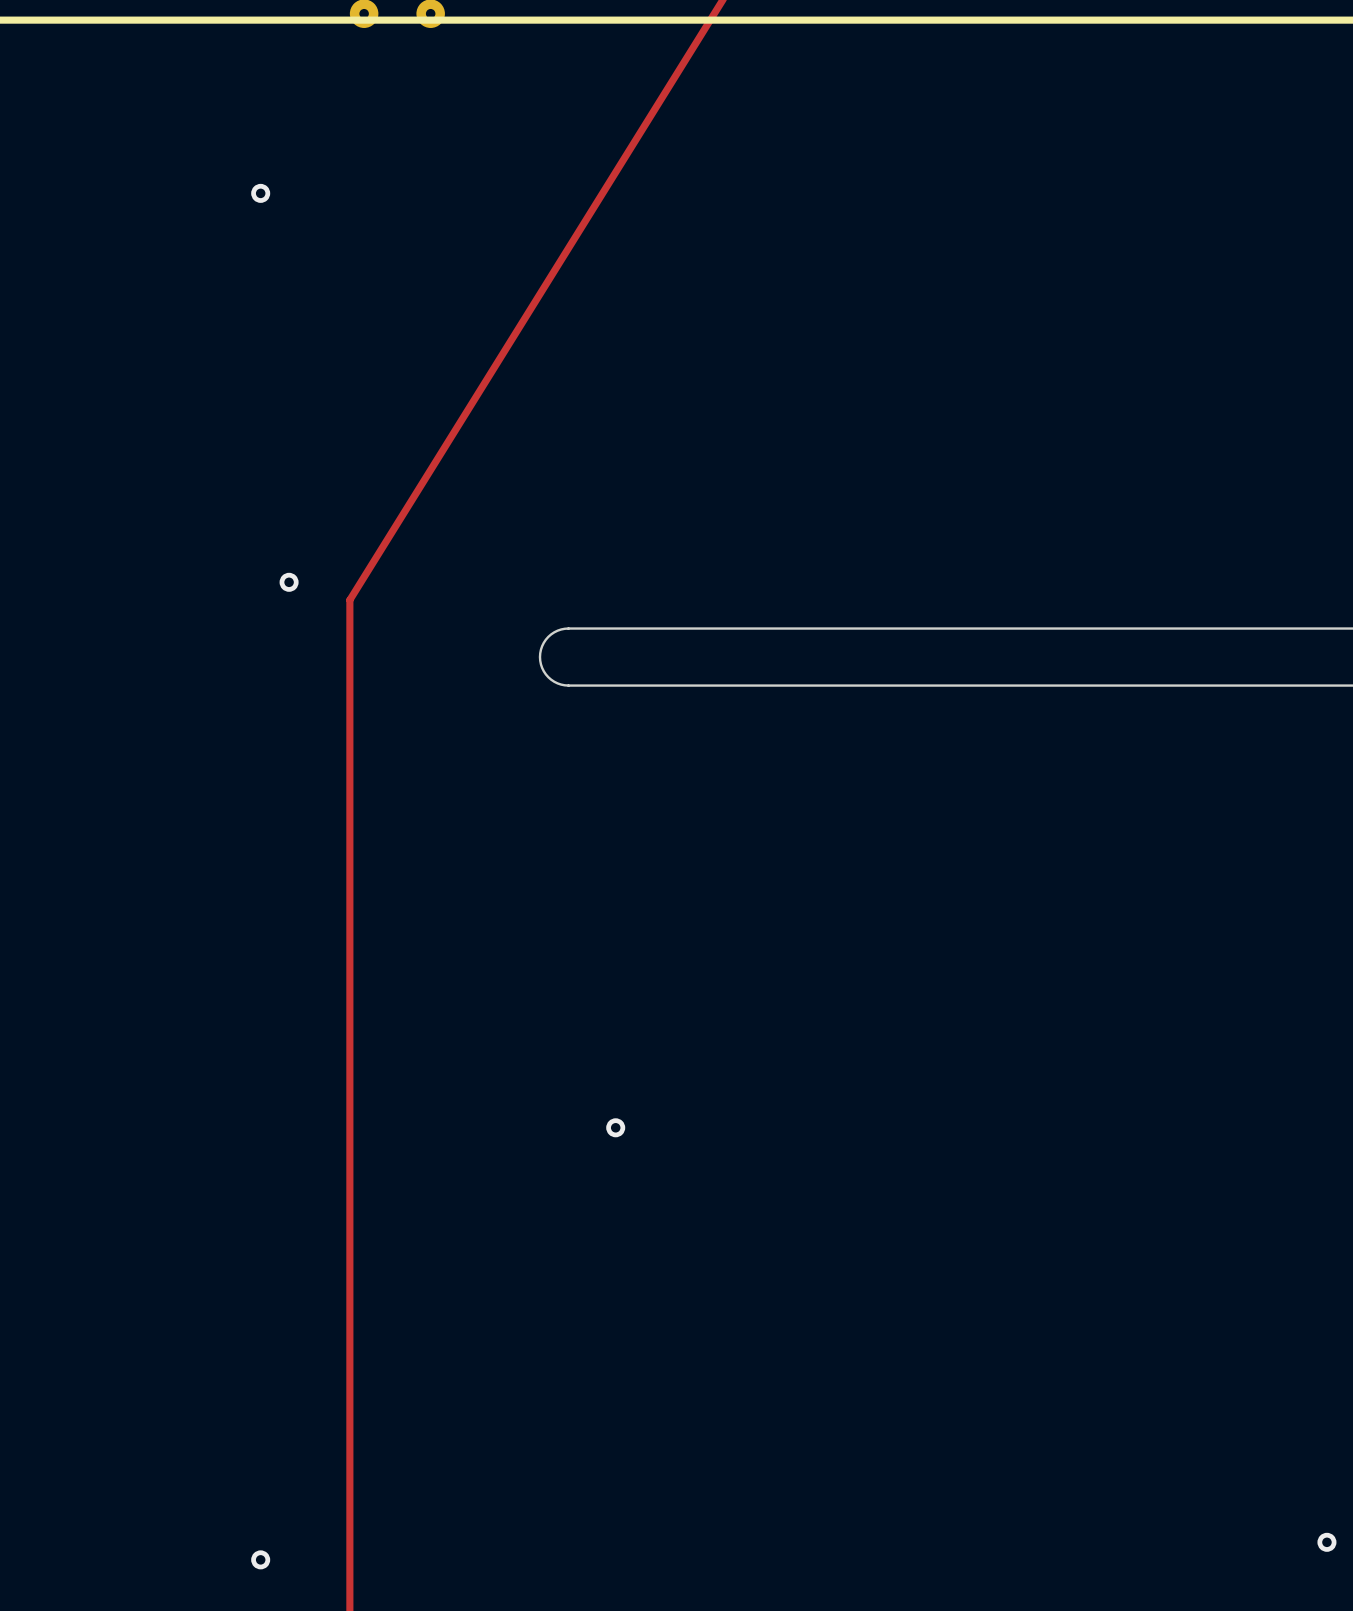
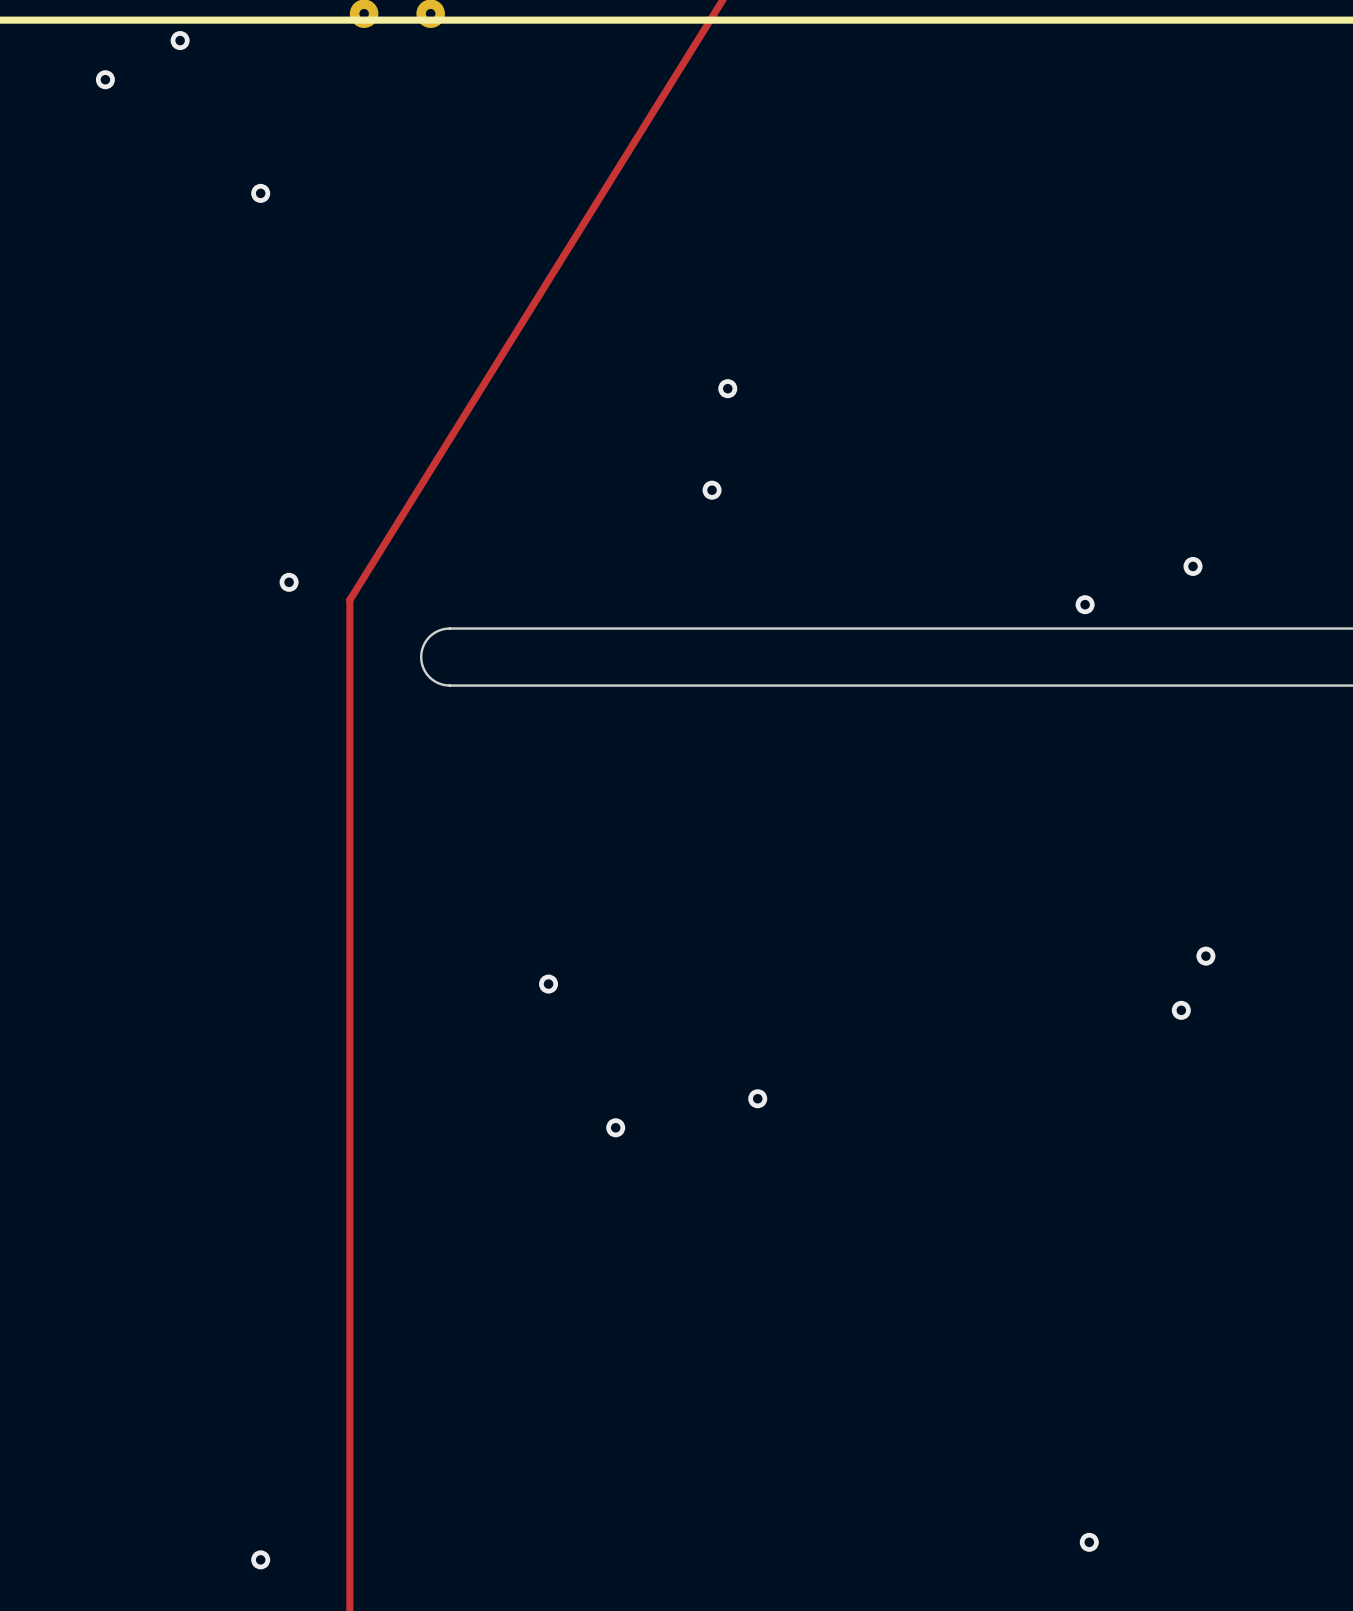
via: none -> (180, 40)
via: none -> (105, 79)
via: none -> (727, 388)
via: none -> (712, 490)
via: none -> (1193, 566)
via: none -> (1085, 604)
board edge: (568, 628) (557, 630) (548, 636) (542, 646) (539, 657) (542, 667) (548, 677) (557, 683) (568, 685) -> (568, 628) (445, 628) (435, 632) (427, 639) (421, 657) (427, 674) (435, 681) (445, 685) (568, 685)
via: none -> (1205, 956)
via: none -> (548, 984)
via: none -> (1181, 1010)
via: none -> (757, 1098)
via position: (1326, 1542) -> (1089, 1542)

